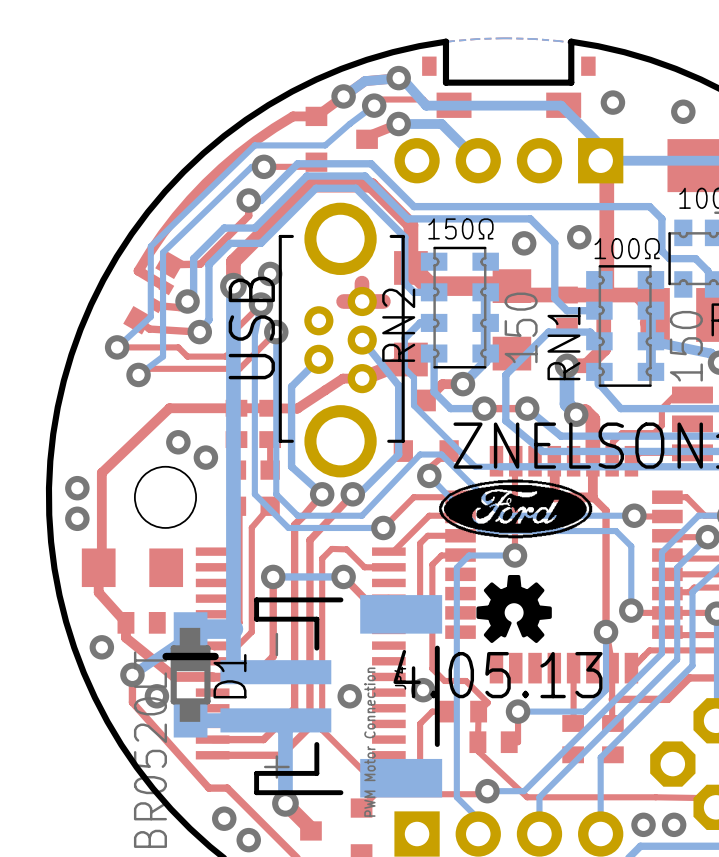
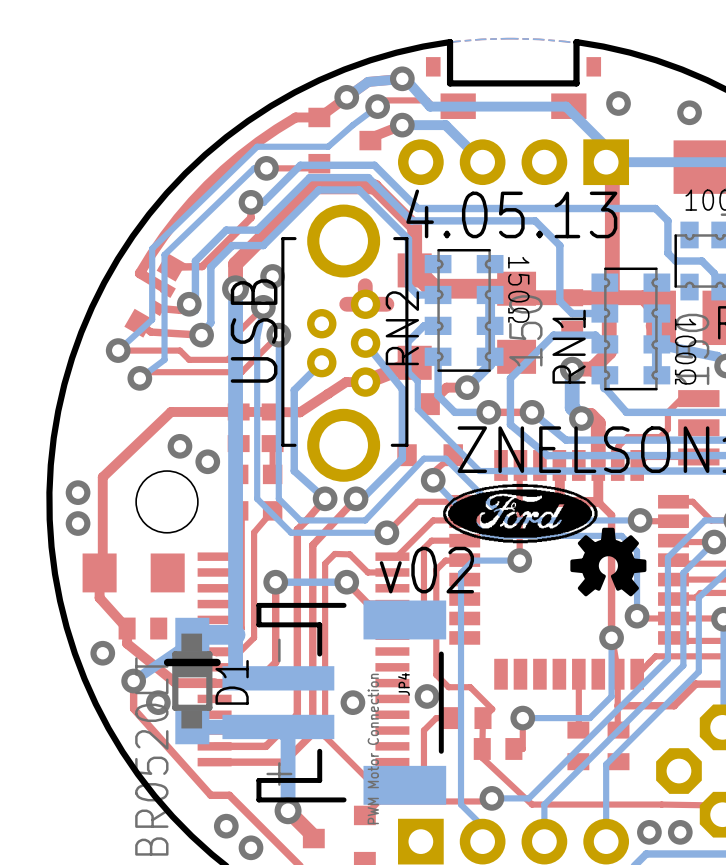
text rotation: 0° (460, 228) -> 90° clockwise (518, 289)
via: (579, 237) -> none
via: (524, 243) -> none
text rotation: 0° (627, 248) -> 90° clockwise (685, 351)
text position: 100Ω (627, 248) -> 100Ω (685, 351)
text: none -> v02 (426, 570)
drawing position: (514, 608) -> (608, 562)
text position: 4.05.13 (498, 674) -> 4.05.13 (511, 213)

